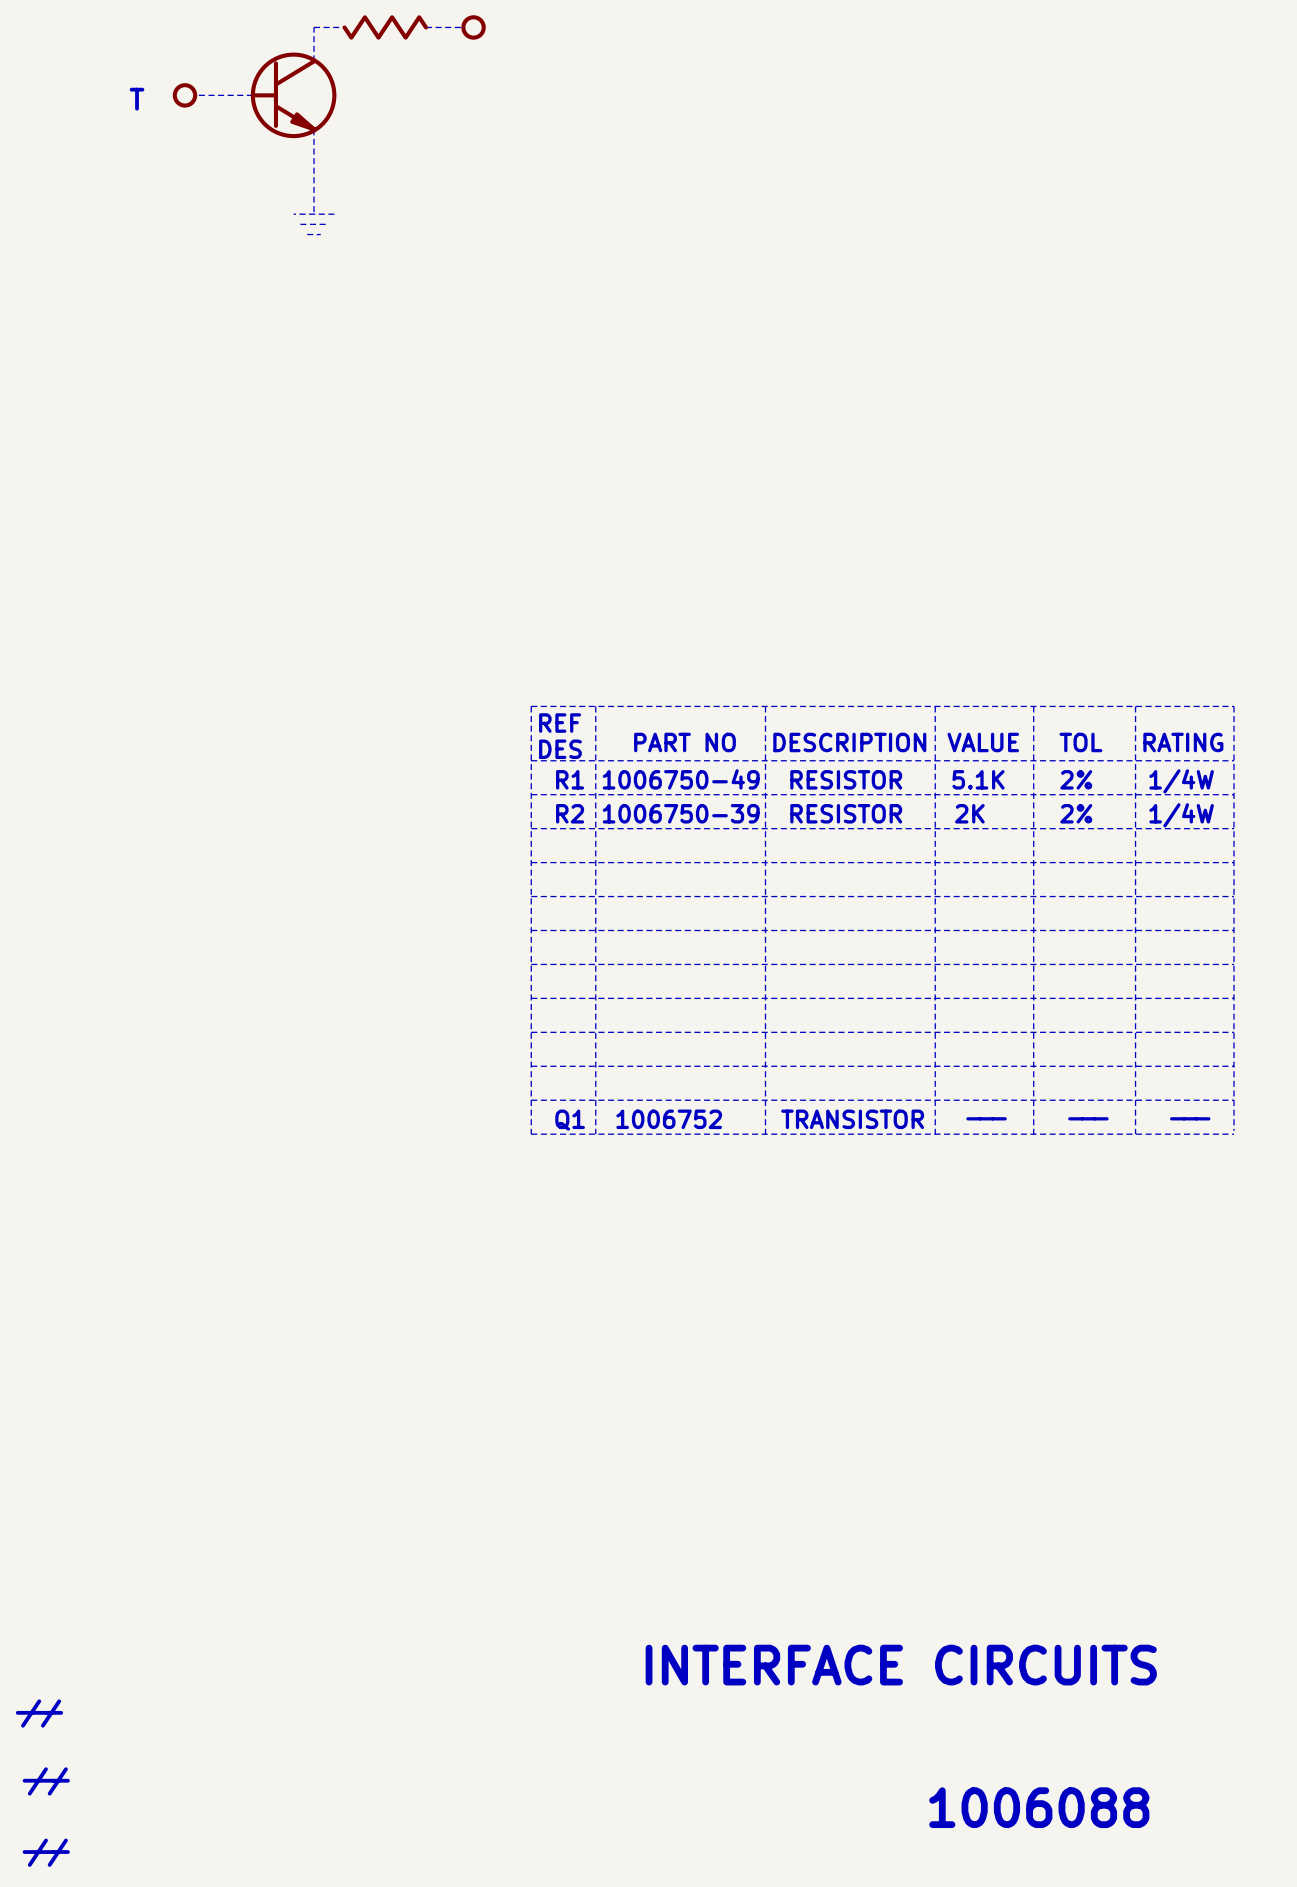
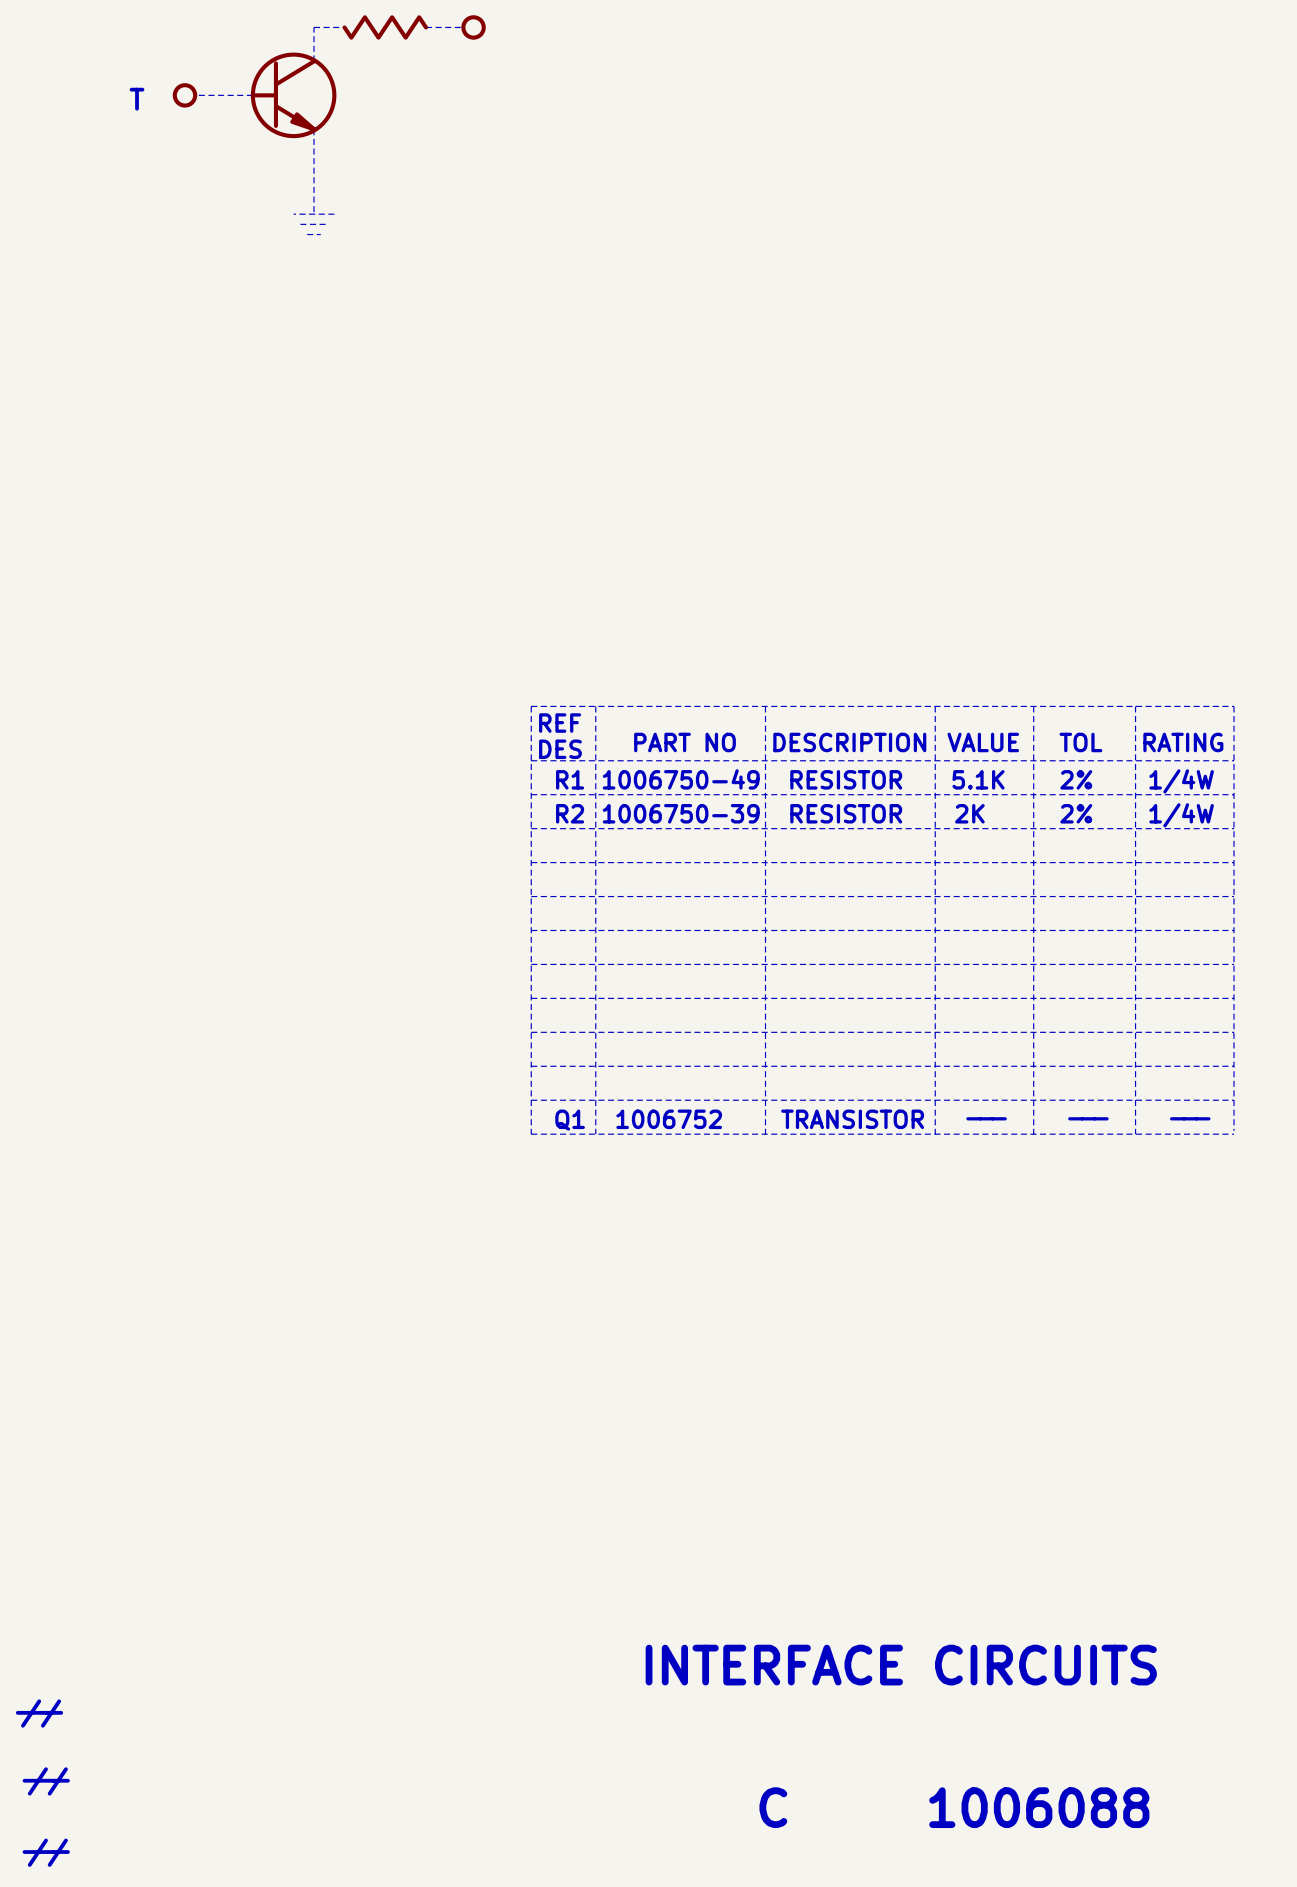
text: none -> C (773, 1807)

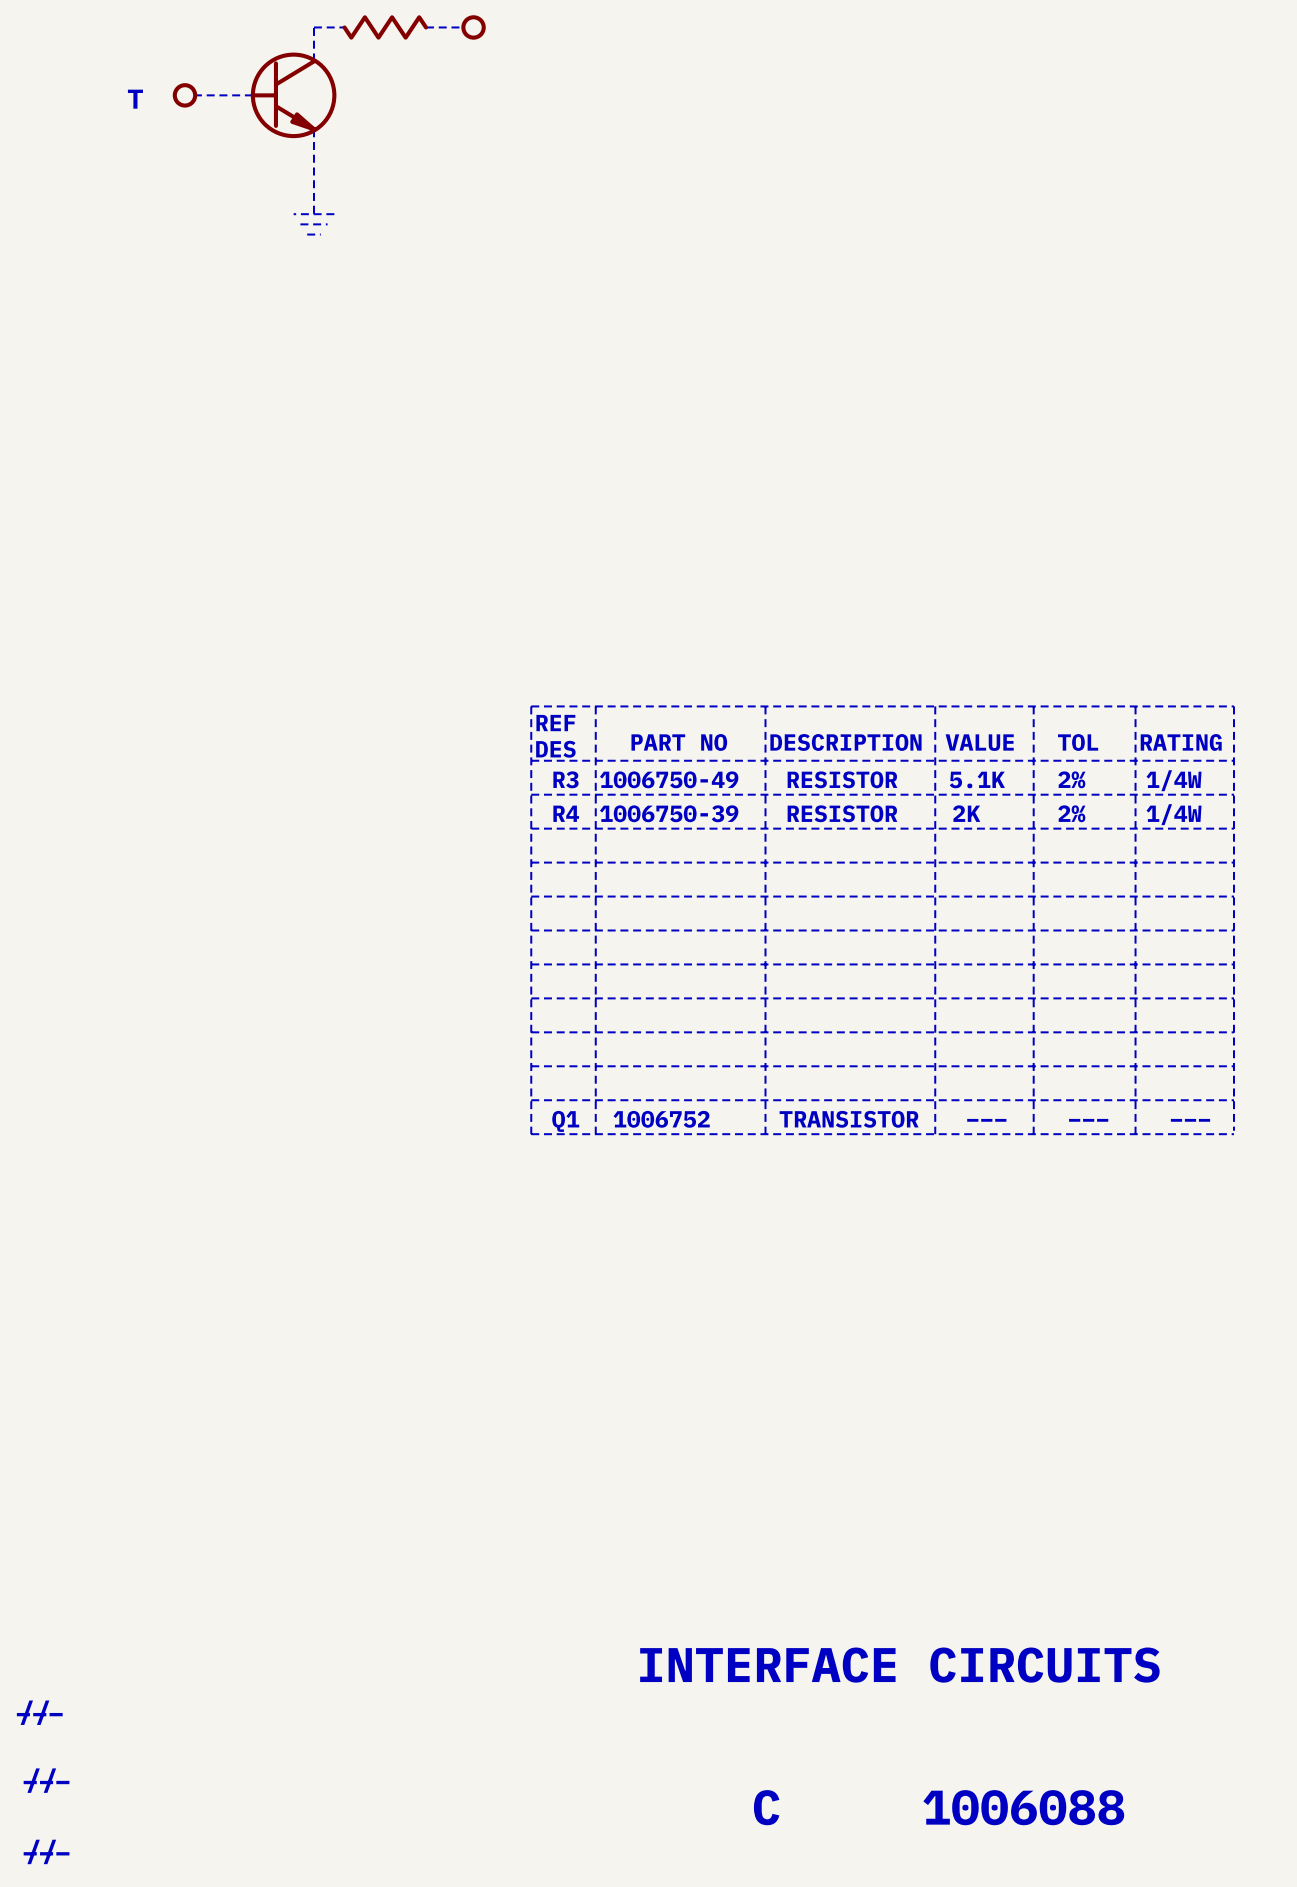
text: R1 (570, 779) -> R3 (565, 779)
text: R2 (570, 813) -> R4 (566, 813)

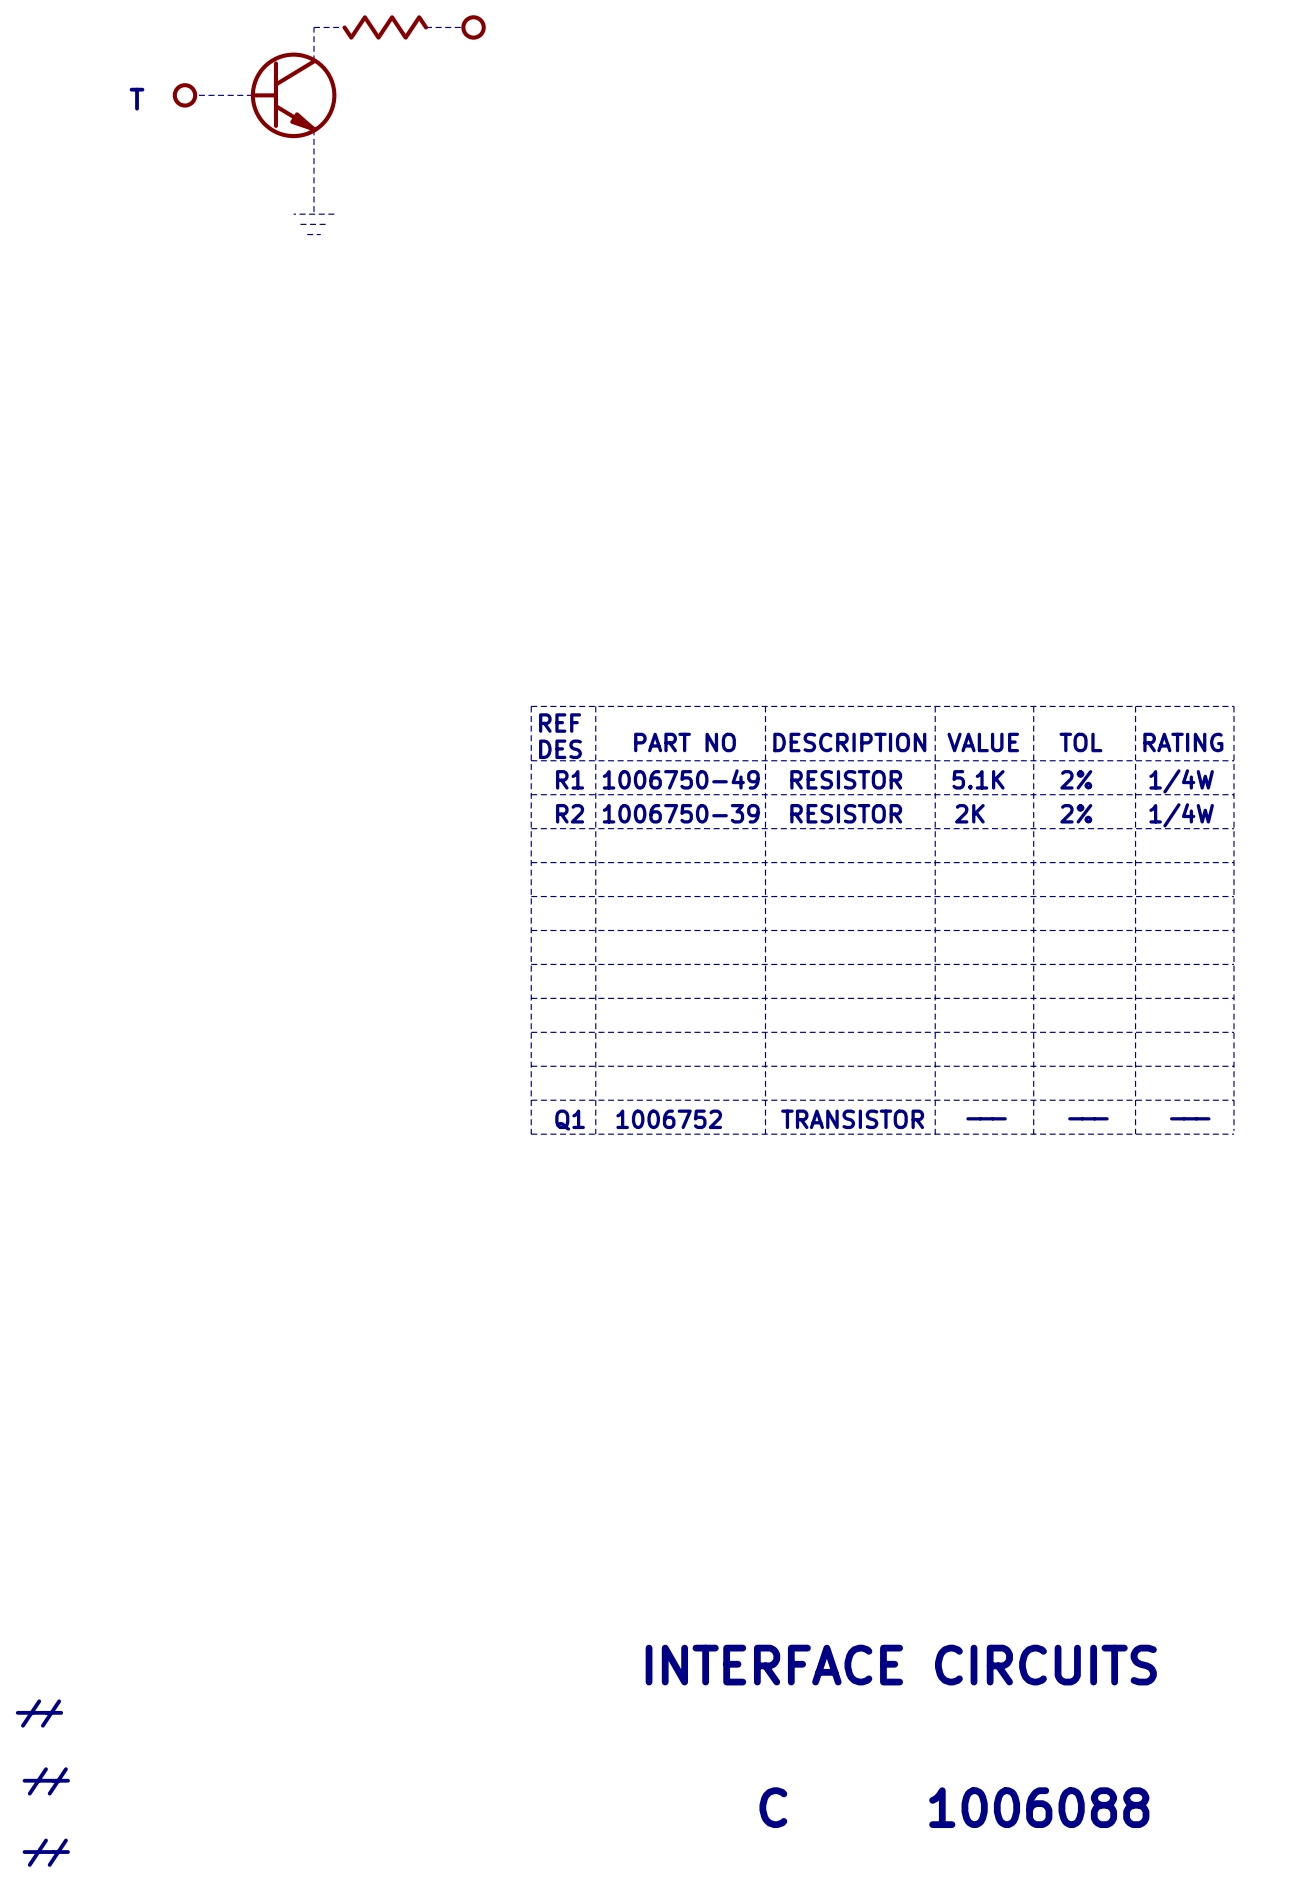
text: R3 (565, 779) -> R1 (570, 779)
text: R4 (566, 813) -> R2 (570, 813)

